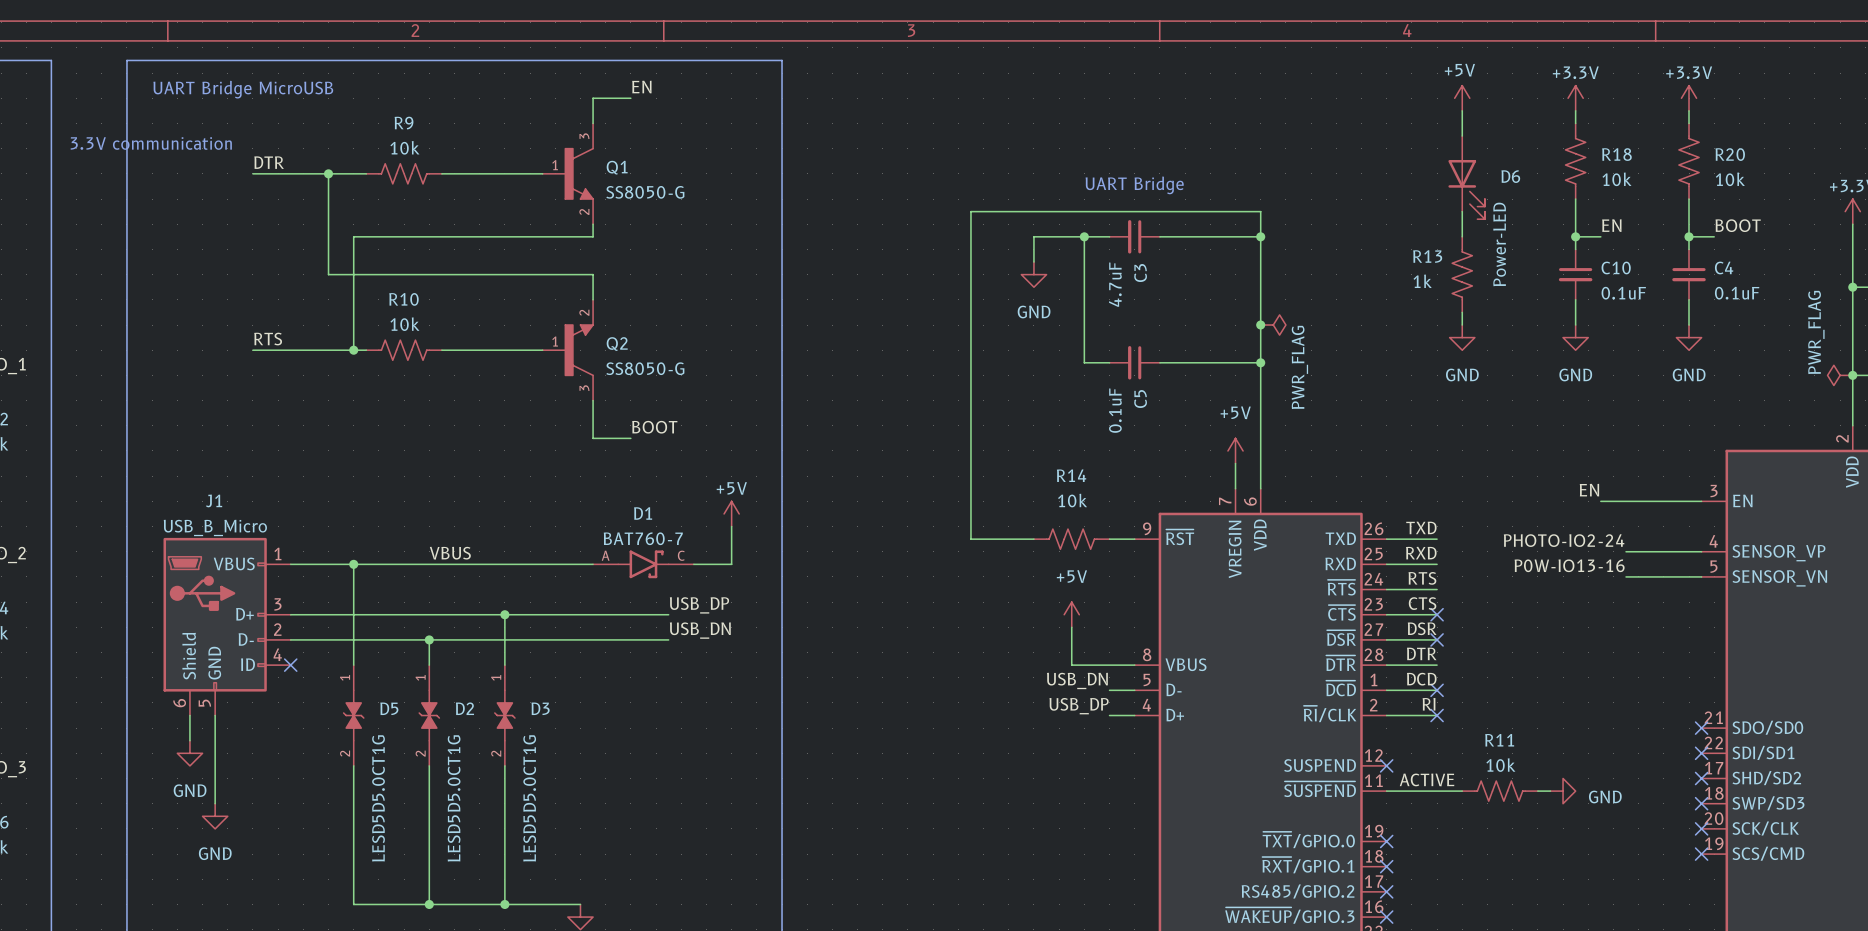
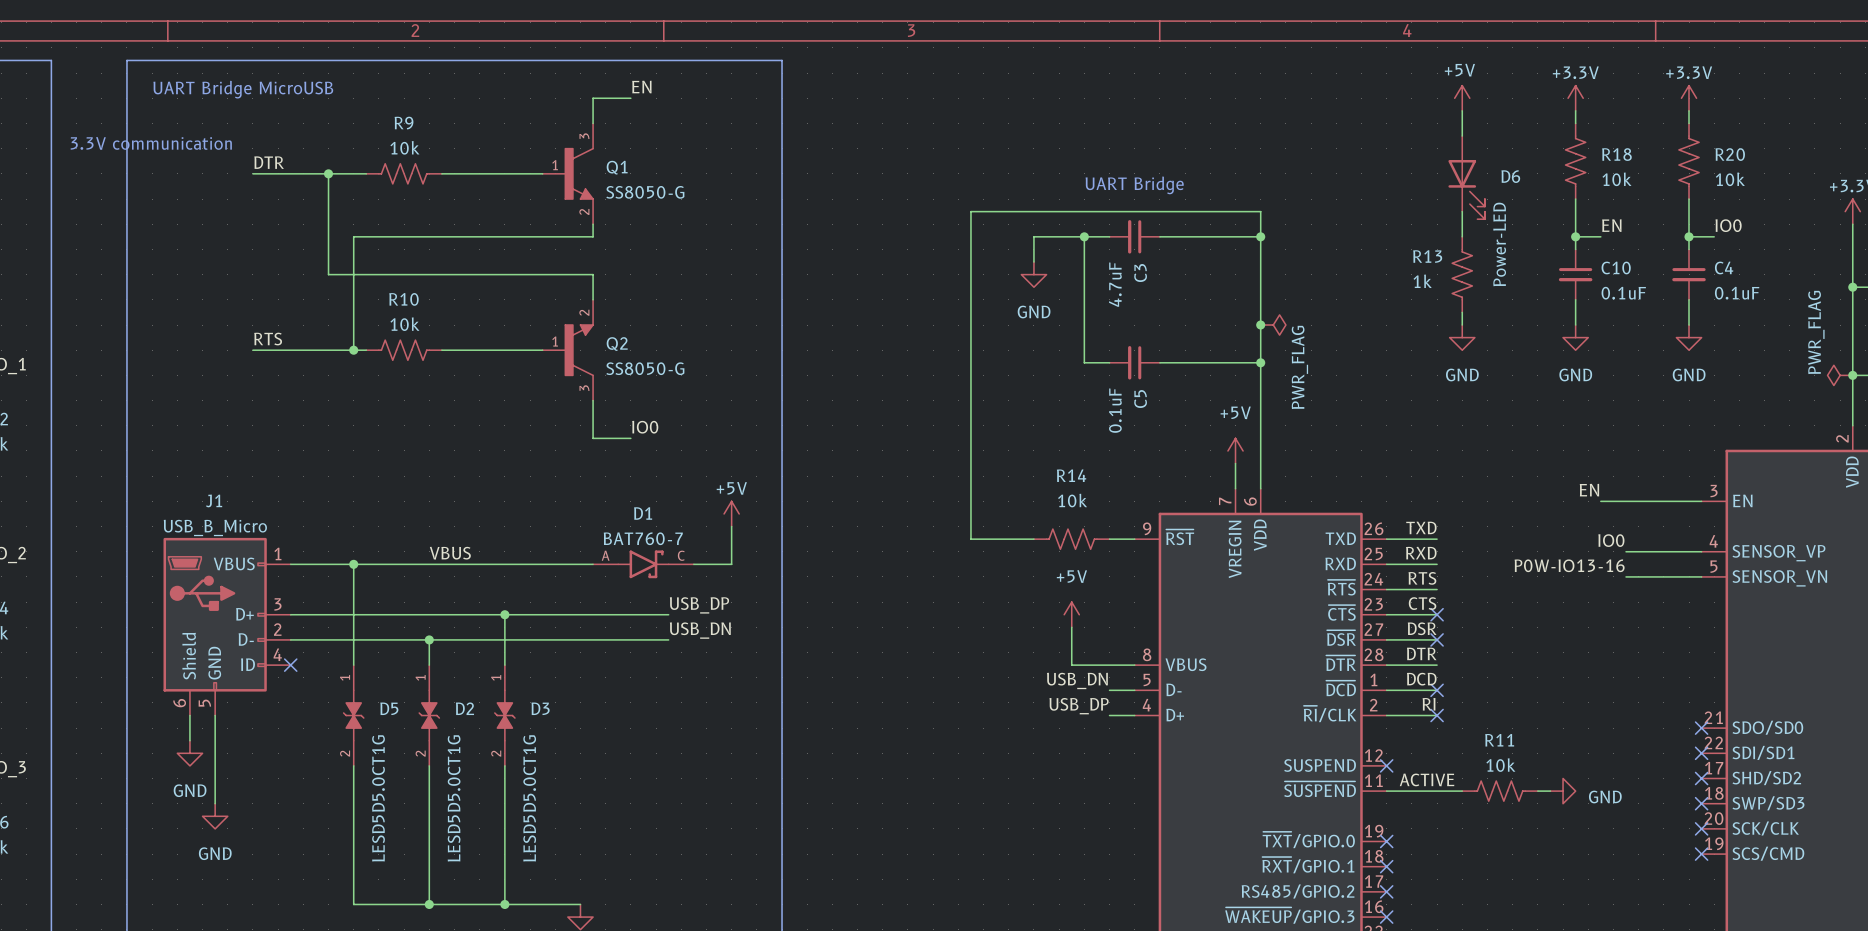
label: BOOT (1738, 225) -> IO0 (1728, 225)
label: BOOT (654, 427) -> IO0 (645, 427)
label: PHOTO-IO2-24 (1564, 540) -> IO0 (1611, 540)

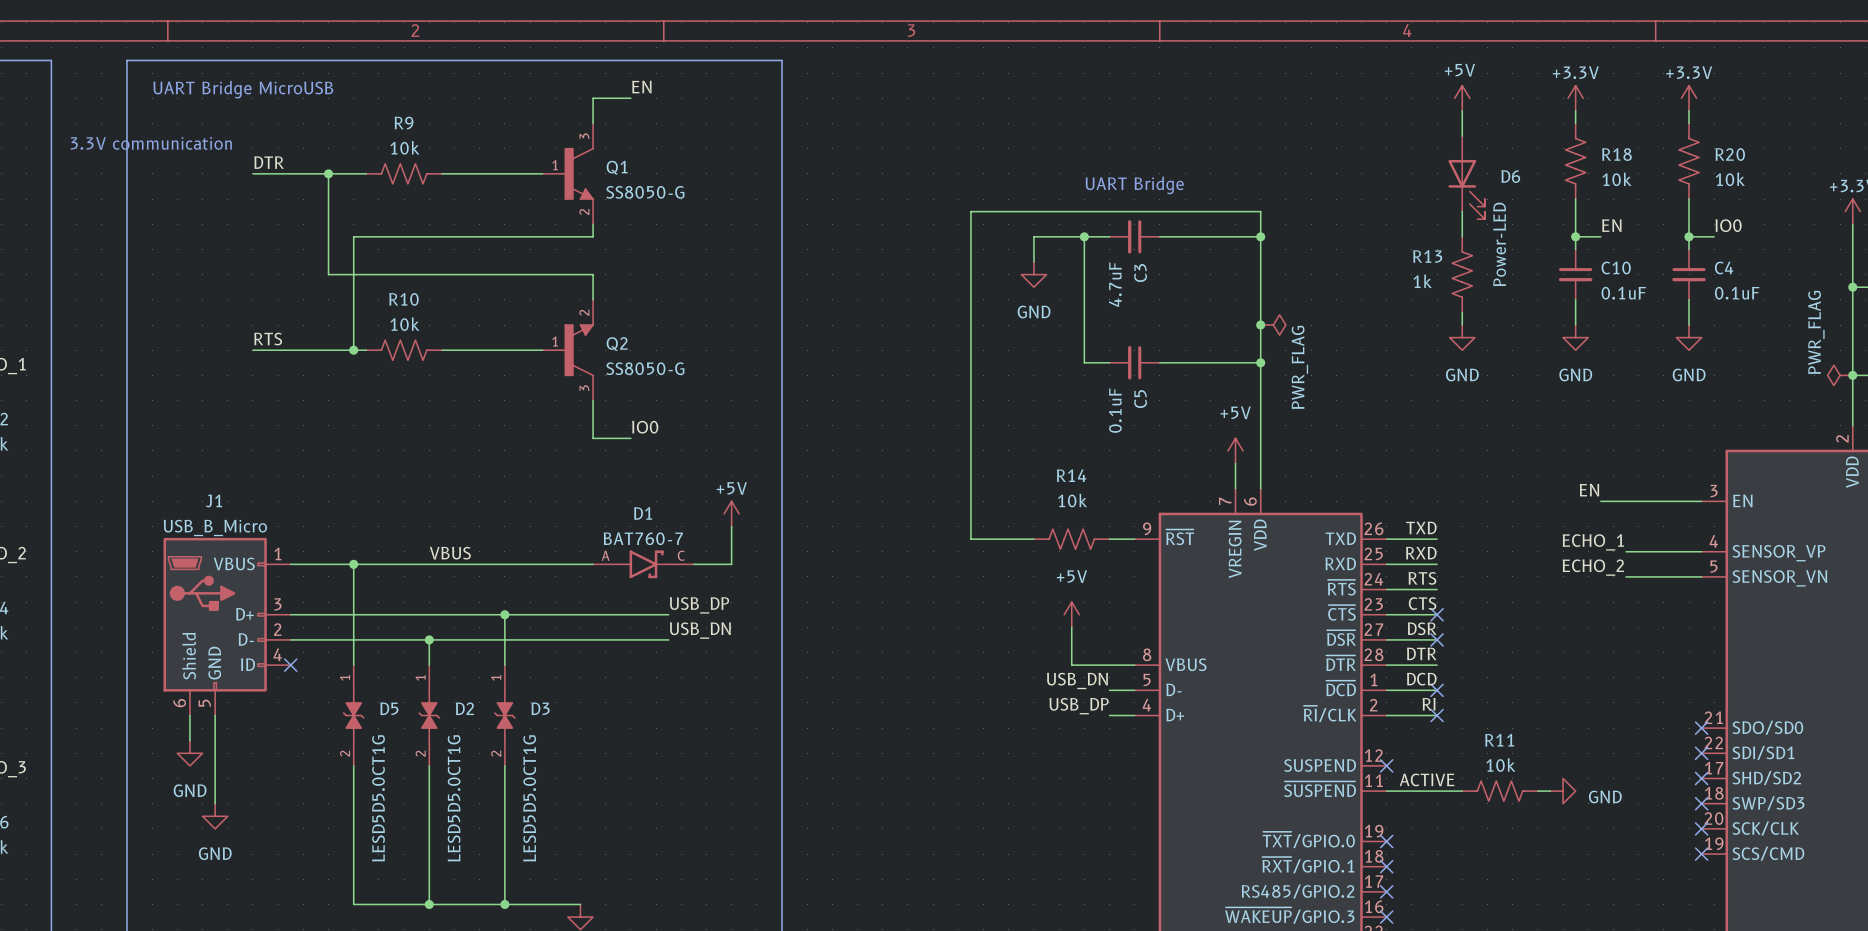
label: IO0 (1611, 540) -> ECHO_1 (1593, 542)
label: P0W-IO13-16 (1569, 565) -> ECHO_2 (1593, 567)

